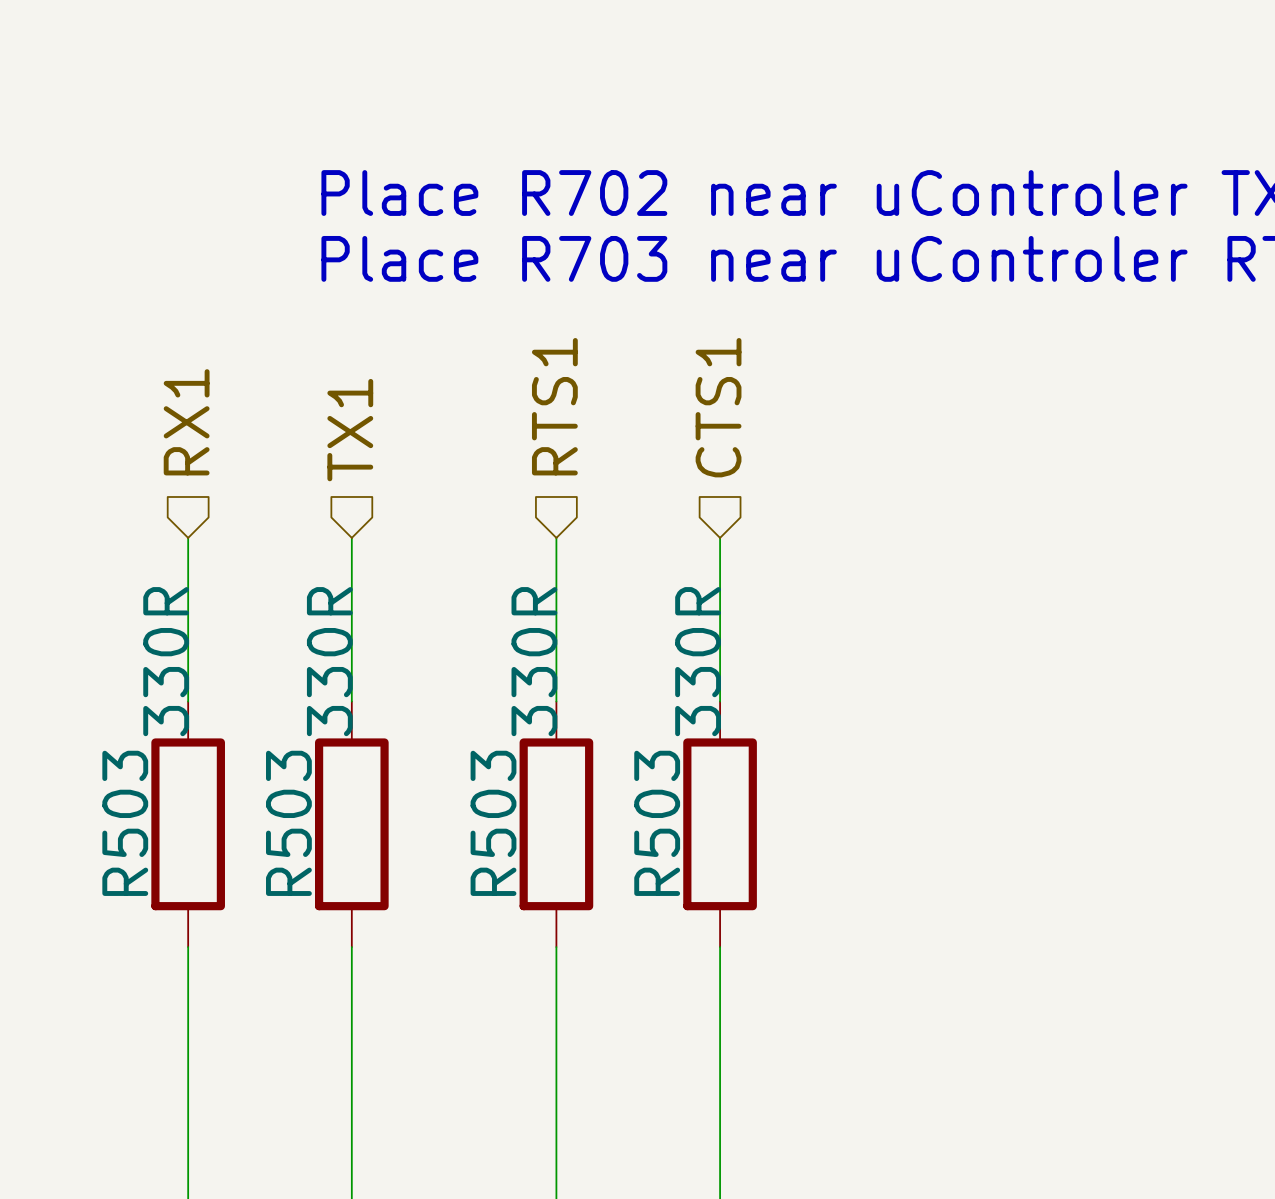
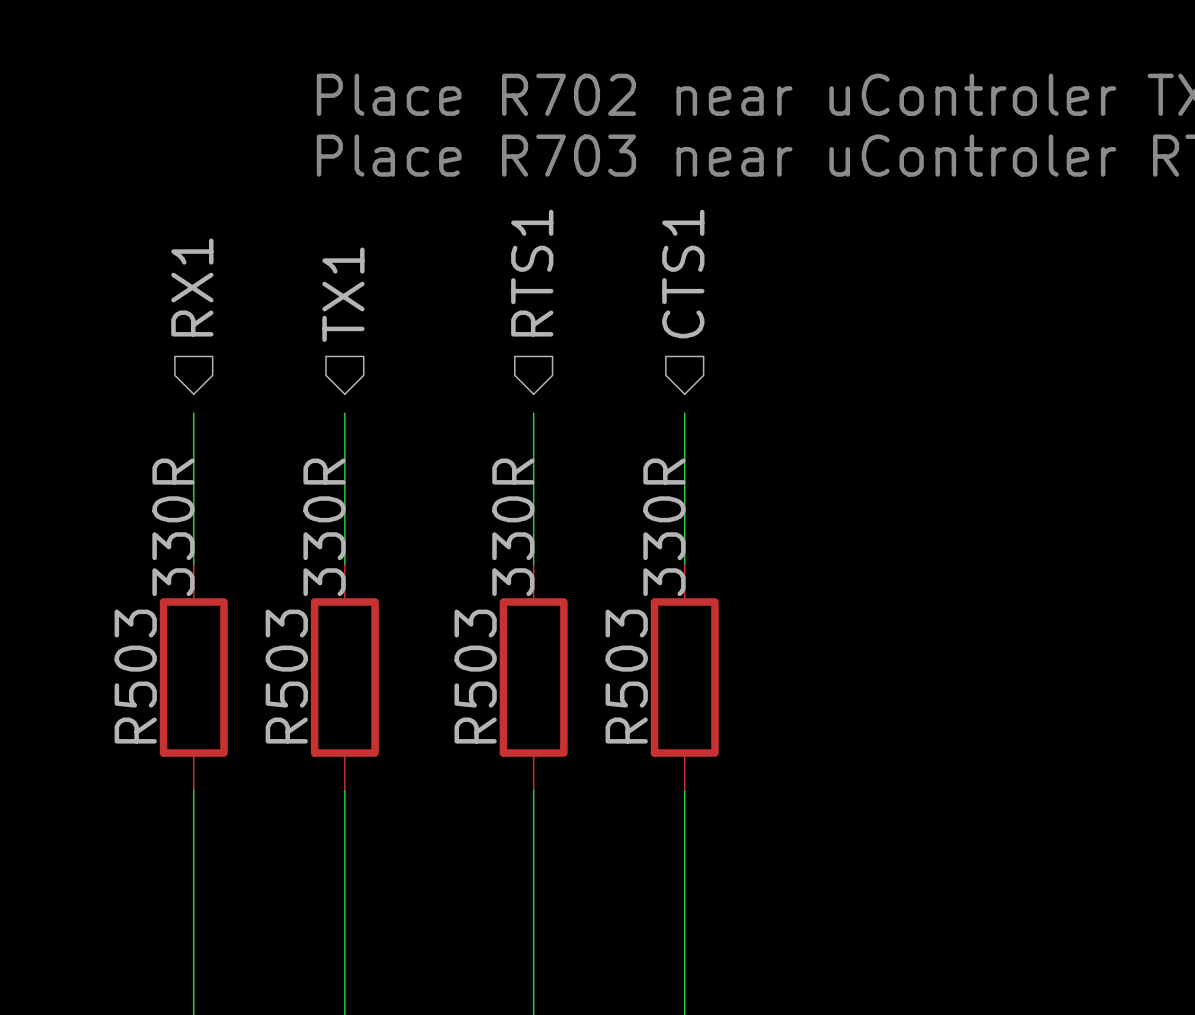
hierarchical label position: RTS1 (554, 406) -> RTS1 (532, 273)
hierarchical label position: CTS1 (718, 407) -> CTS1 (683, 274)
hierarchical label position: RX1 (186, 422) -> RX1 (192, 287)
hierarchical label position: TX1 (350, 430) -> TX1 (343, 294)

